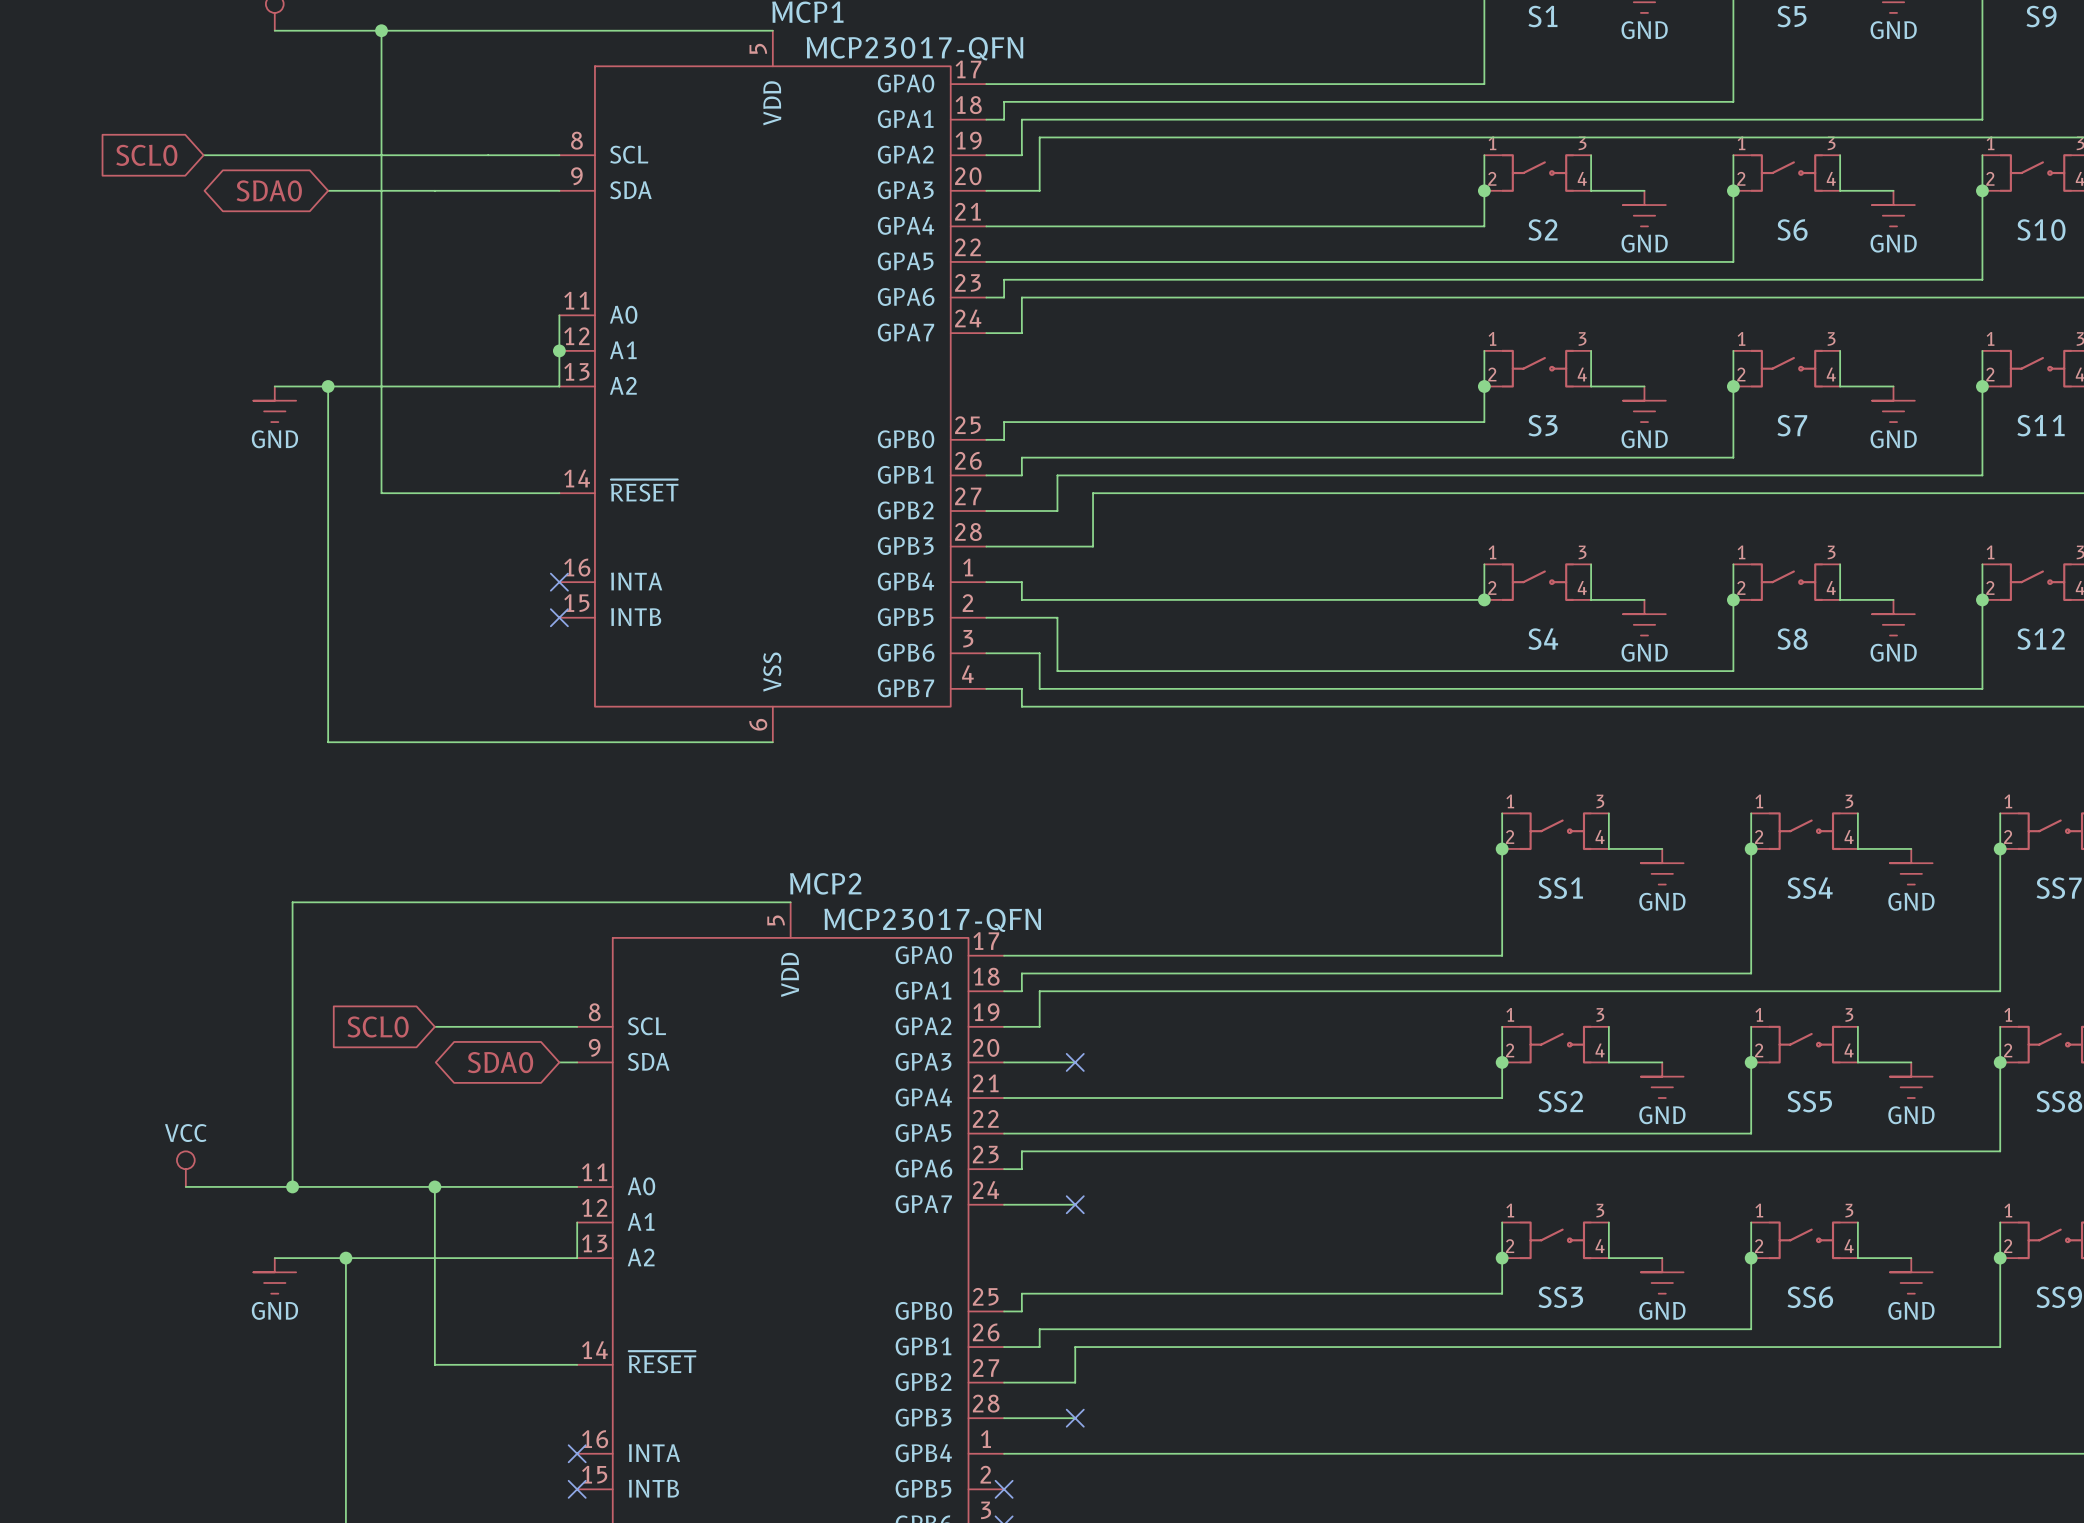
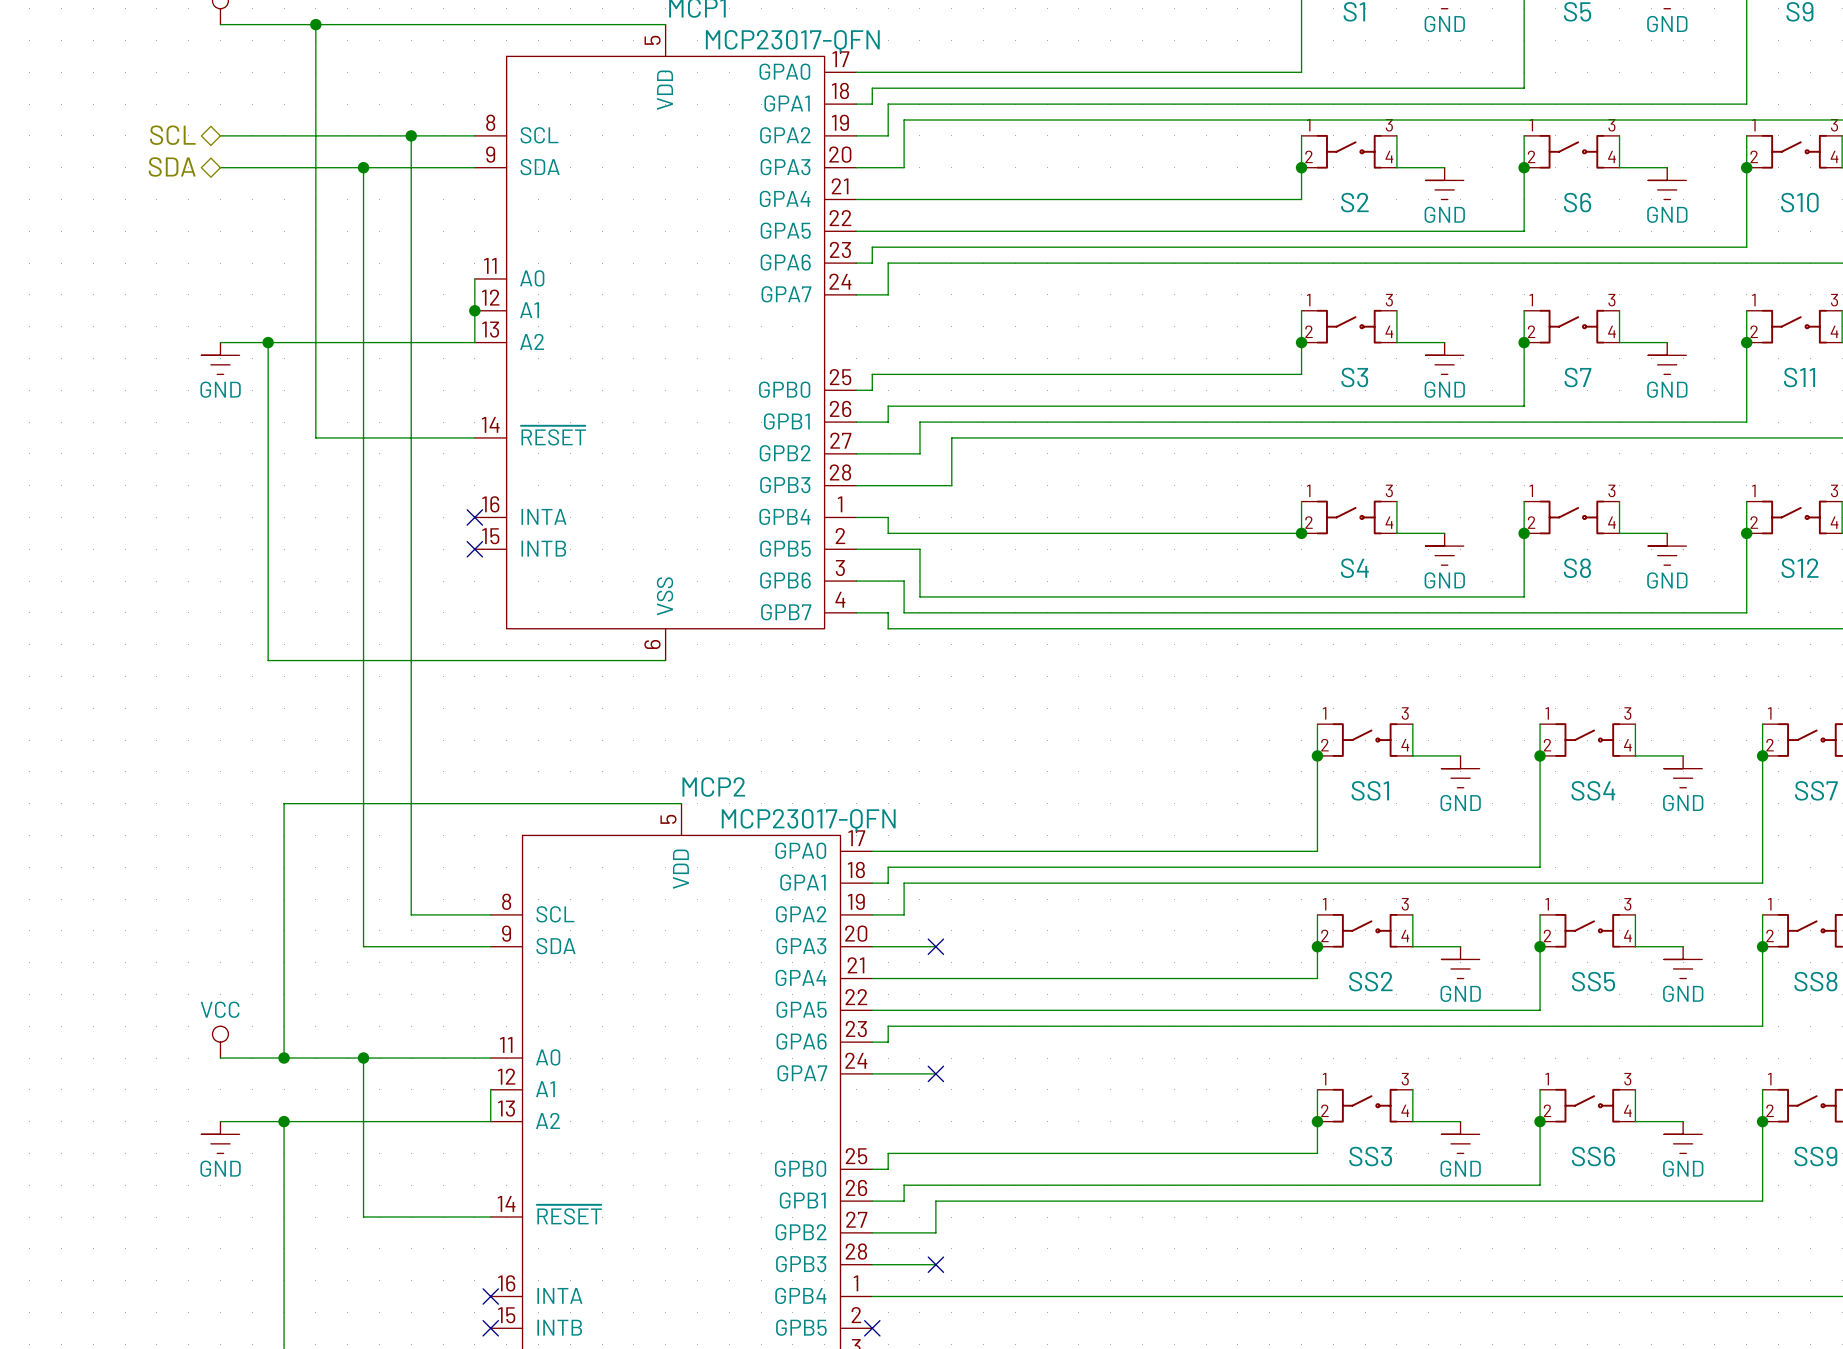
hierarchical label: none -> SCL (172, 135)
global label: SCL0 (146, 155) -> none
wire: (203, 155) (274, 155) -> none
junction: none -> (411, 135)
hierarchical label: none -> SDA (172, 166)
global label: SDA0 (269, 190) -> none
wire: none -> (220, 167) (268, 167)
wire: none -> (363, 167) (363, 946) (474, 946)
junction: none -> (363, 167)
wire: (345, 902) (292, 902) (292, 1186) -> (284, 803) (284, 1058)
global label: SCL0 (378, 1026) -> none
wire: (434, 1026) (488, 1026) -> (411, 135) (411, 914)
global label: SDA0 (500, 1062) -> none
power symbol position: VCC (185, 1169) -> VCC (220, 1042)
wire: (185, 1186) (274, 1186) -> none
junction position: (292, 1186) -> (284, 1058)

